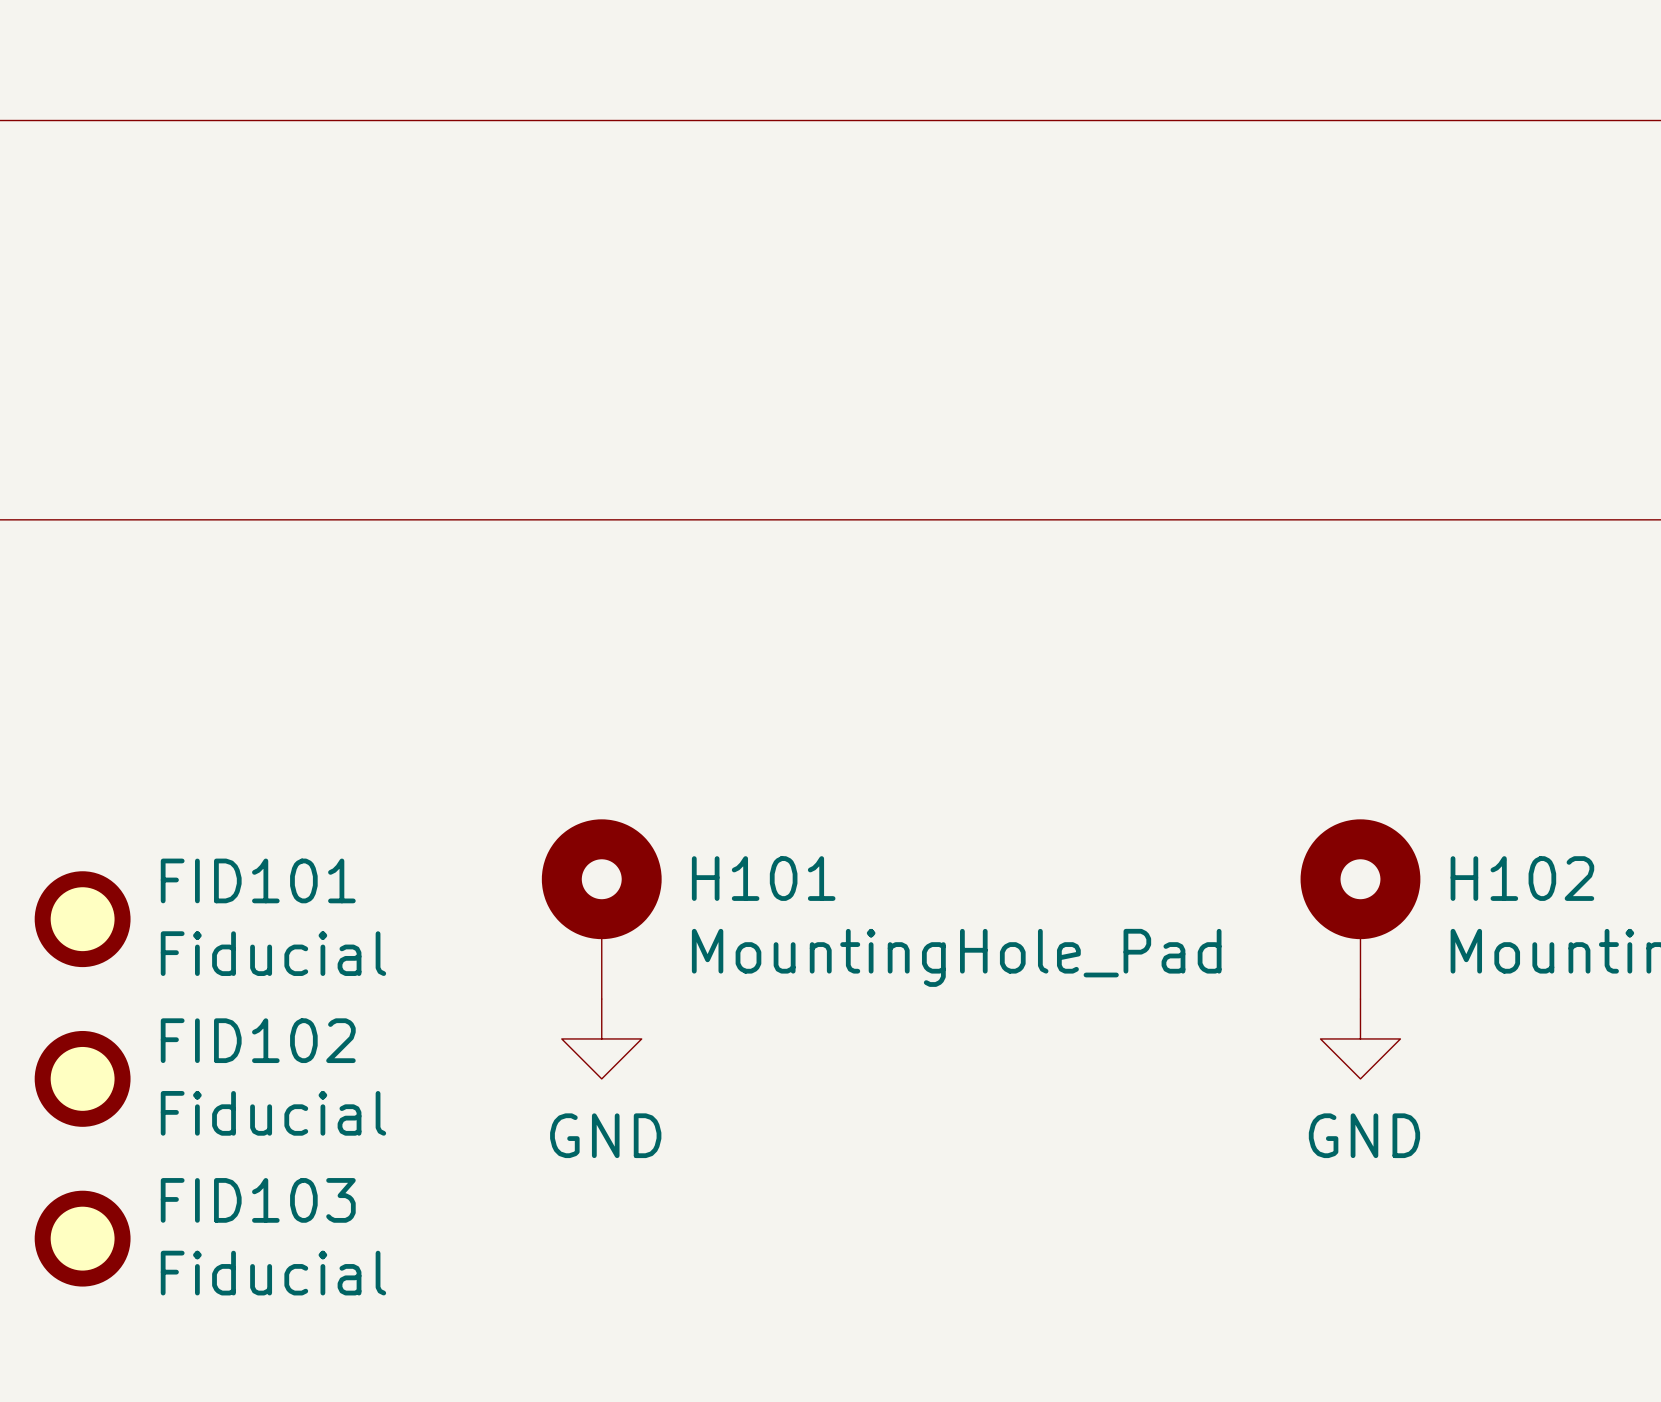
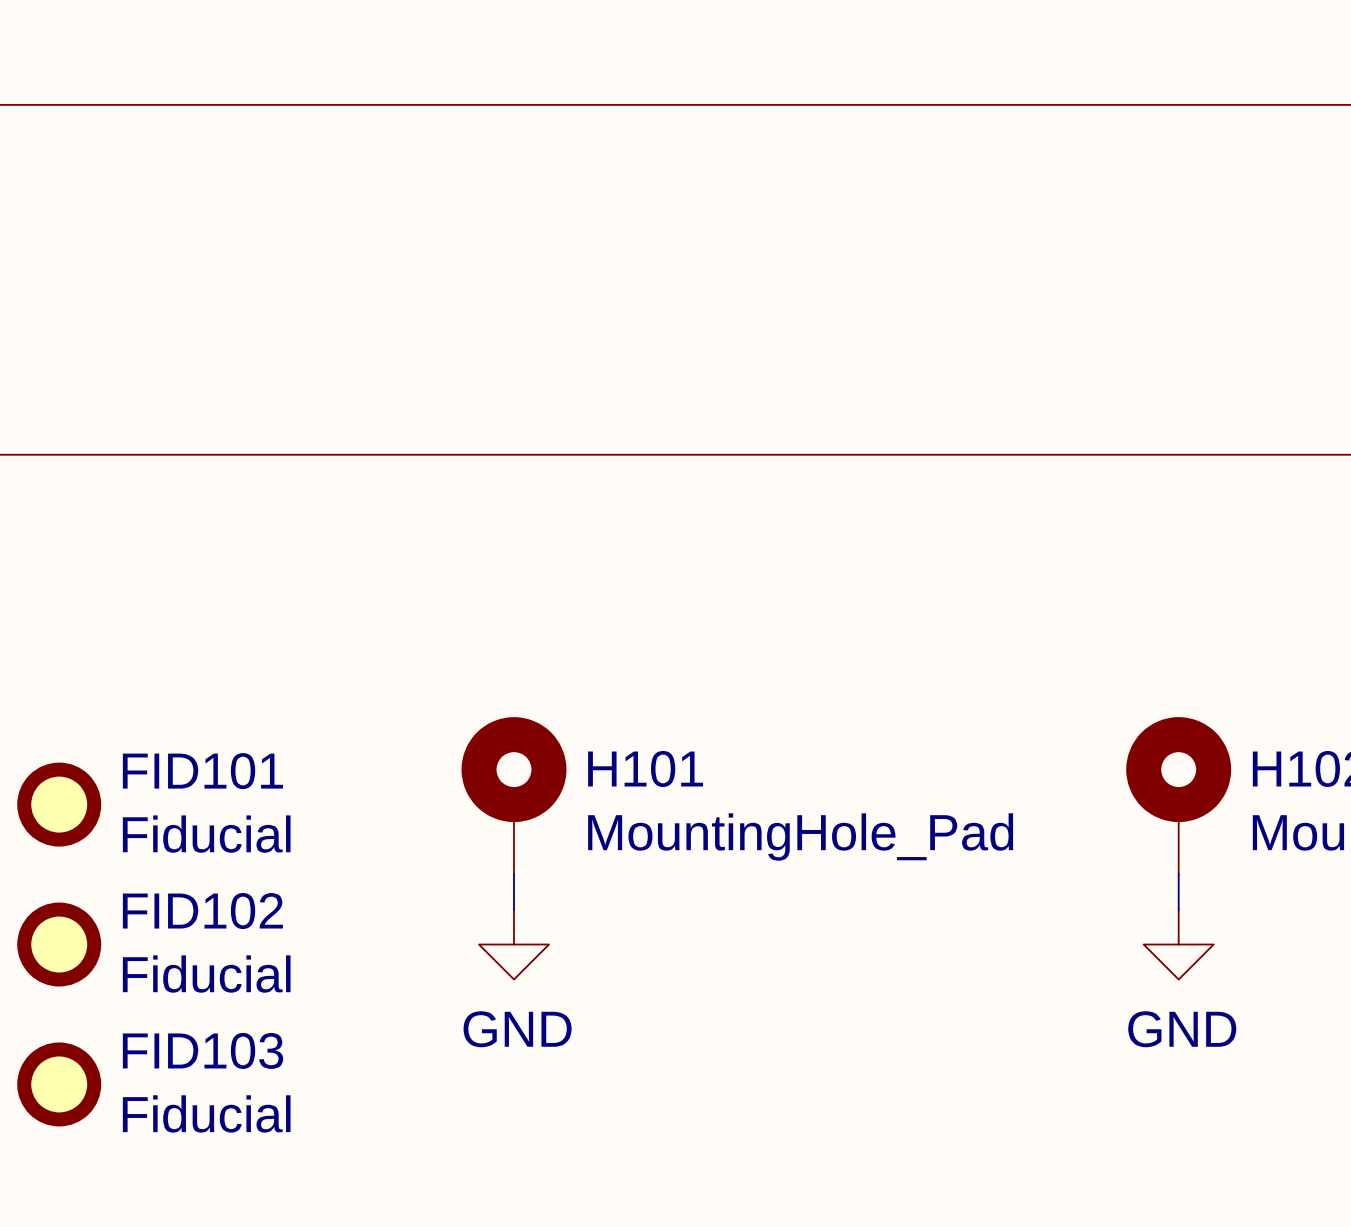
power symbol position: GND (601, 1038) -> GND (514, 944)
power symbol position: GND (1360, 1038) -> GND (1178, 944)

